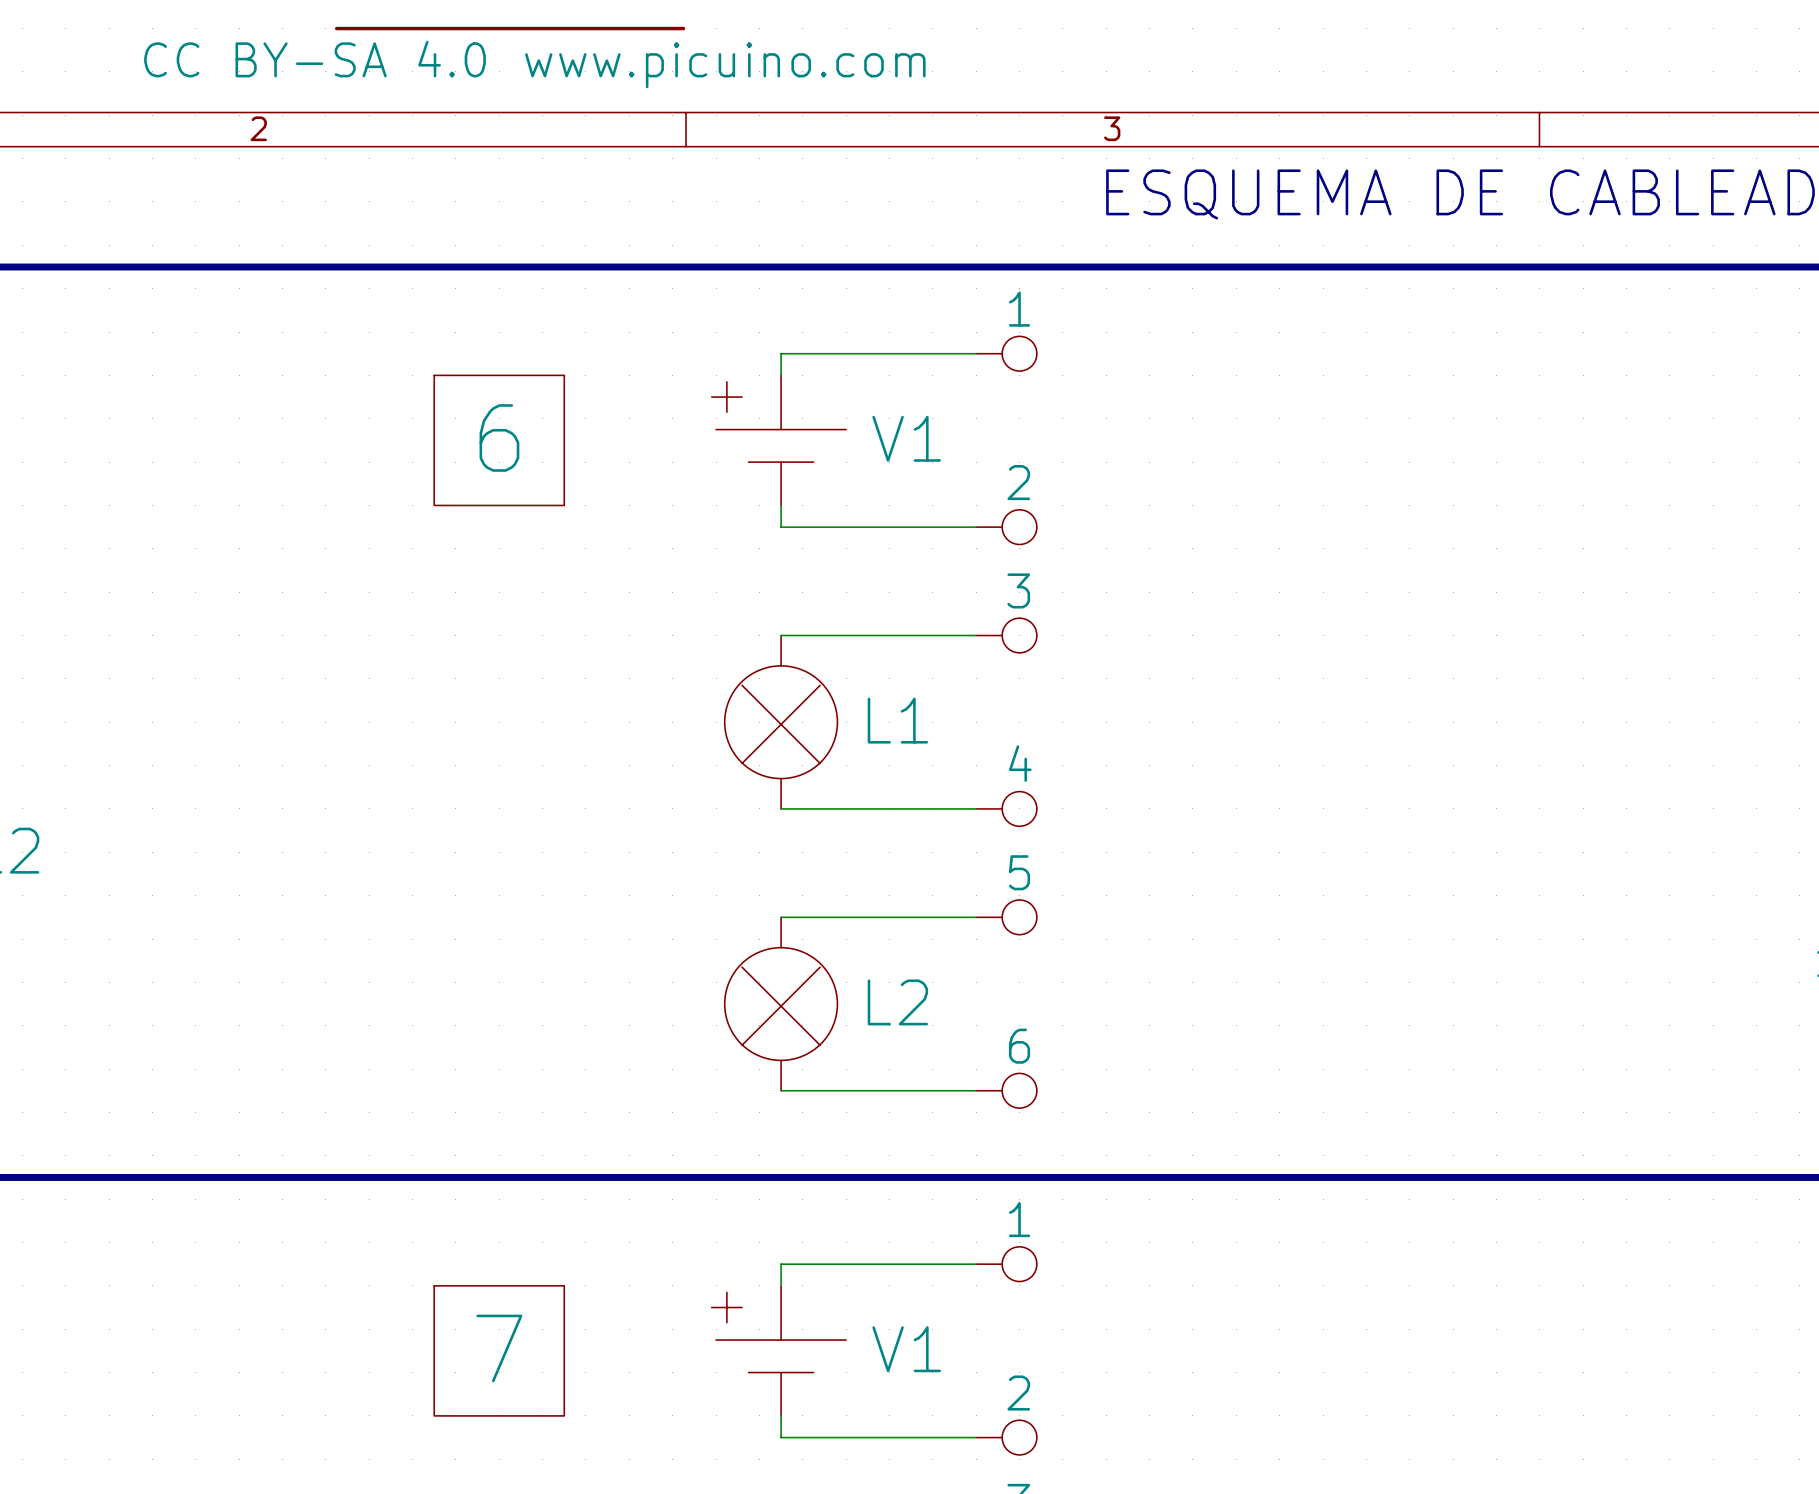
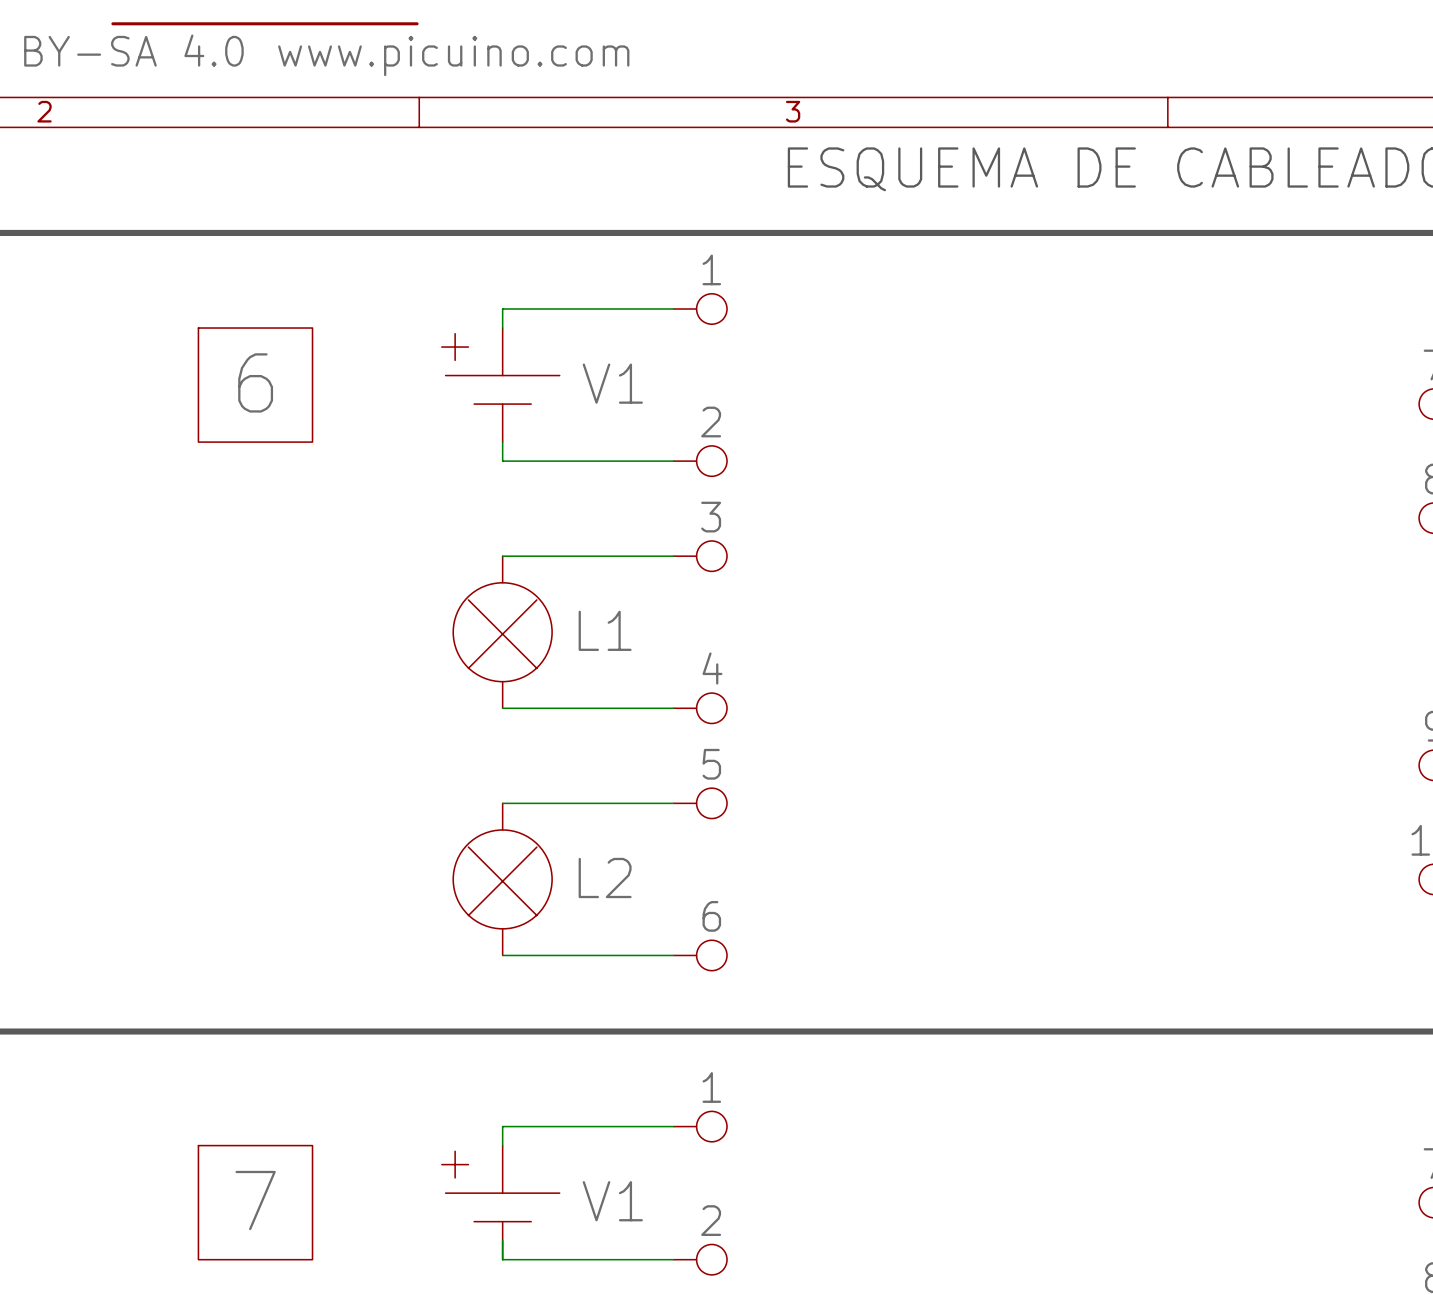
wire: (976, 1264) (781, 1264) (781, 1285) -> (673, 1126) (502, 1126) (502, 1145)
part position: (1006, 1264) -> (700, 1126)
part position: (499, 1350) -> (255, 1202)
V1 position: (778, 1350) -> (500, 1202)

